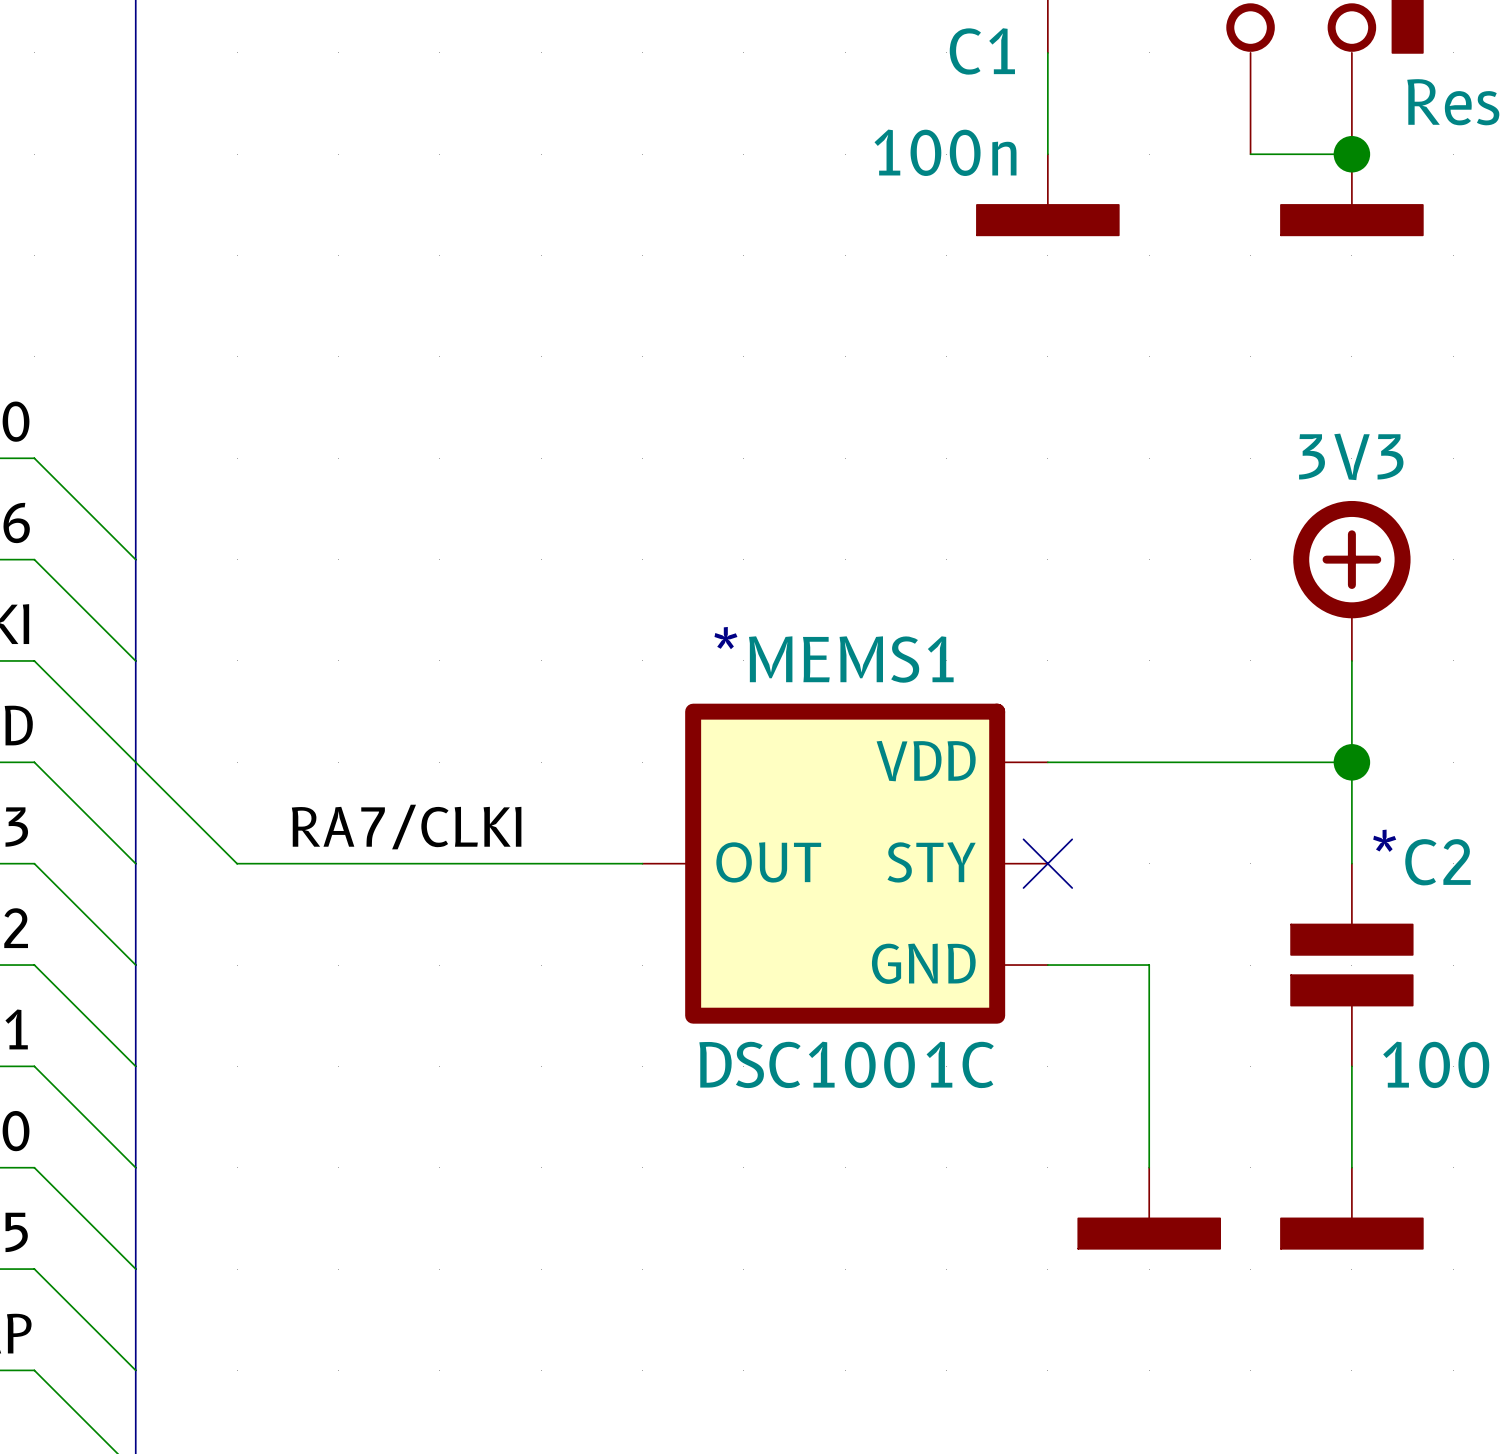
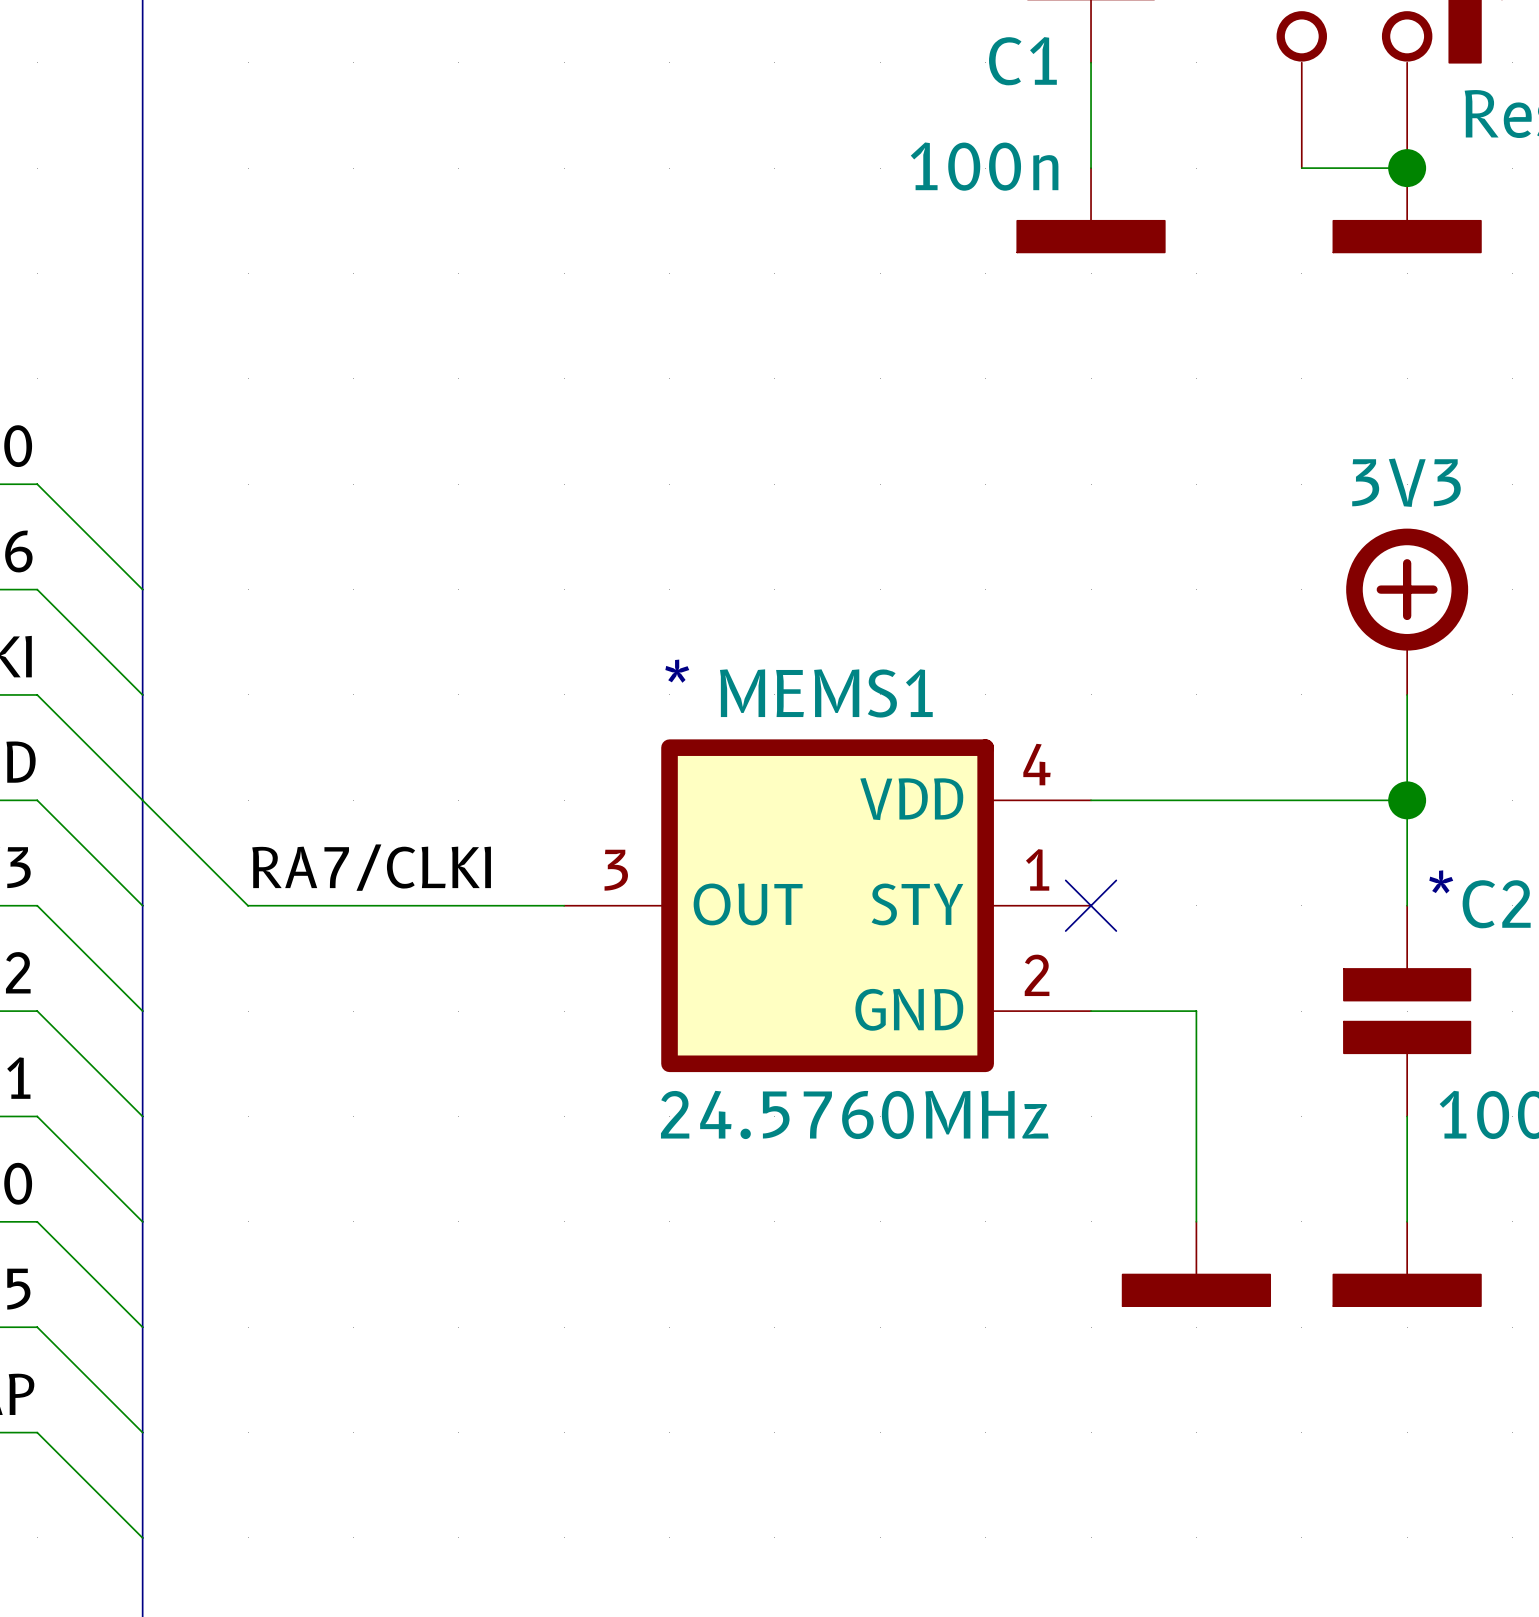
text position: * (725, 638) -> * (677, 671)
MEMS1 symbol: [642, 703, 1048, 1024] -> [564, 739, 1092, 1073]
label position: RA7/CLKI (406, 827) -> RA7/CLKI (371, 867)
MEMS1 value: DSC1001C (846, 1064) -> 24.5760MHz (854, 1114)

